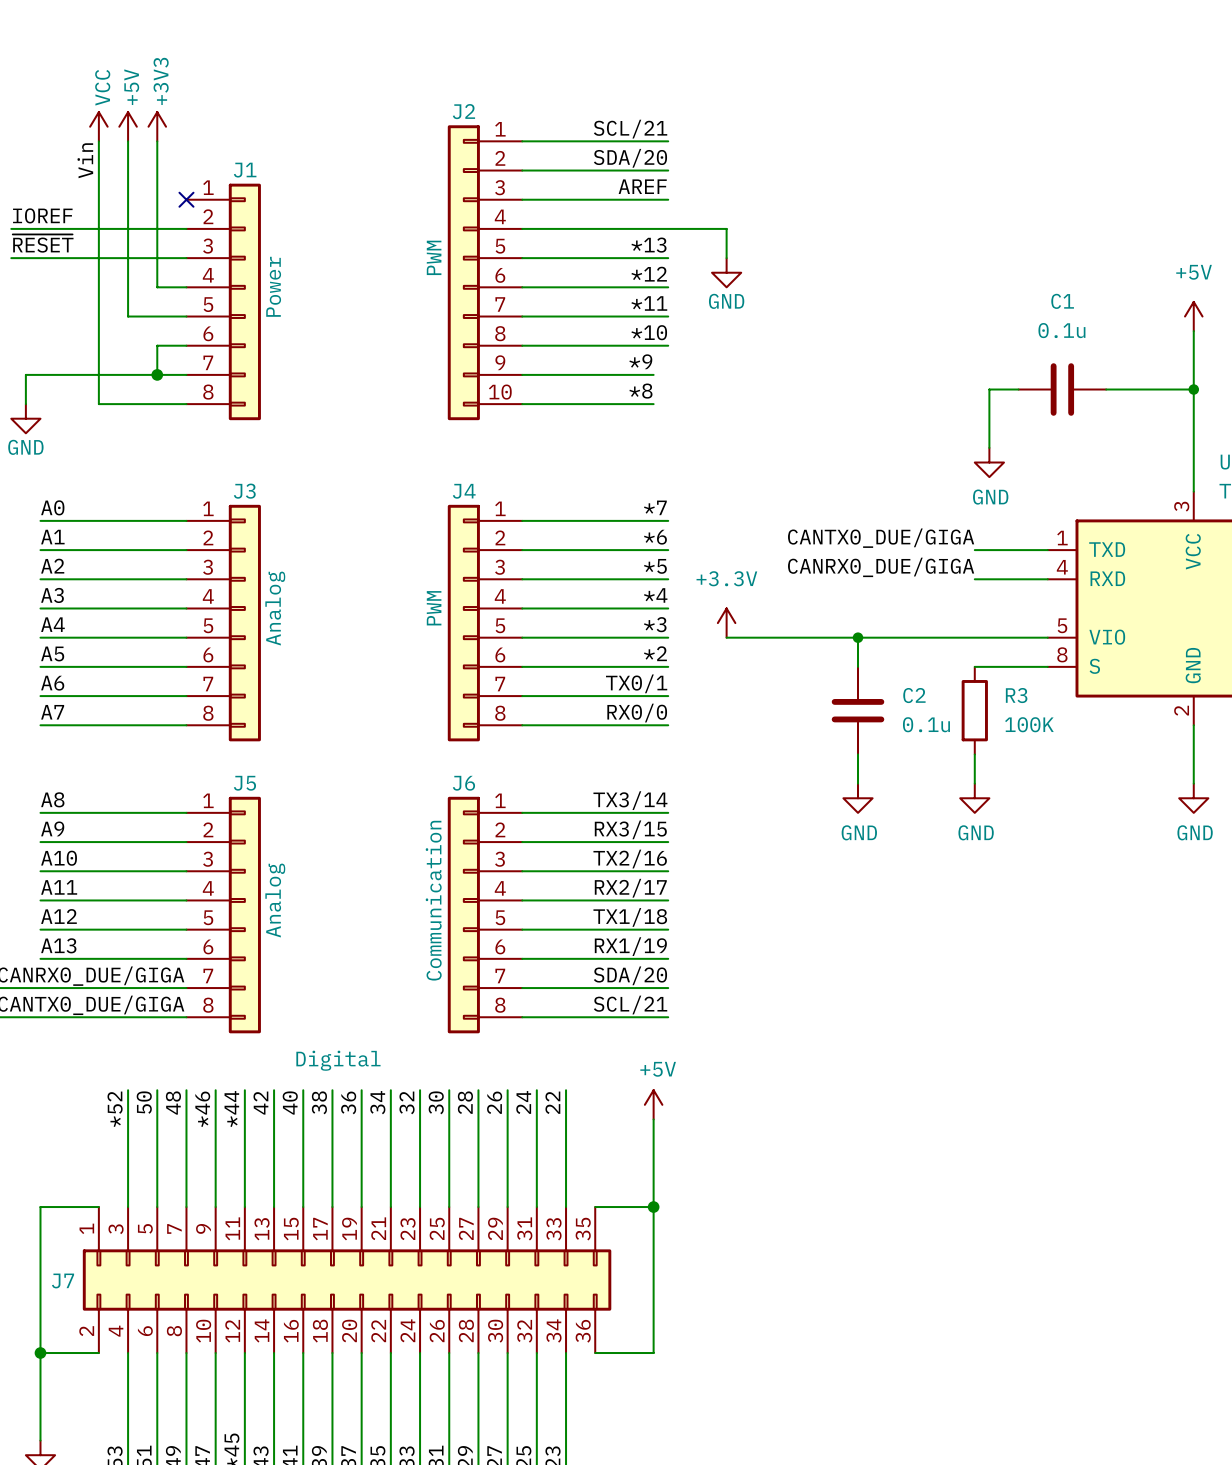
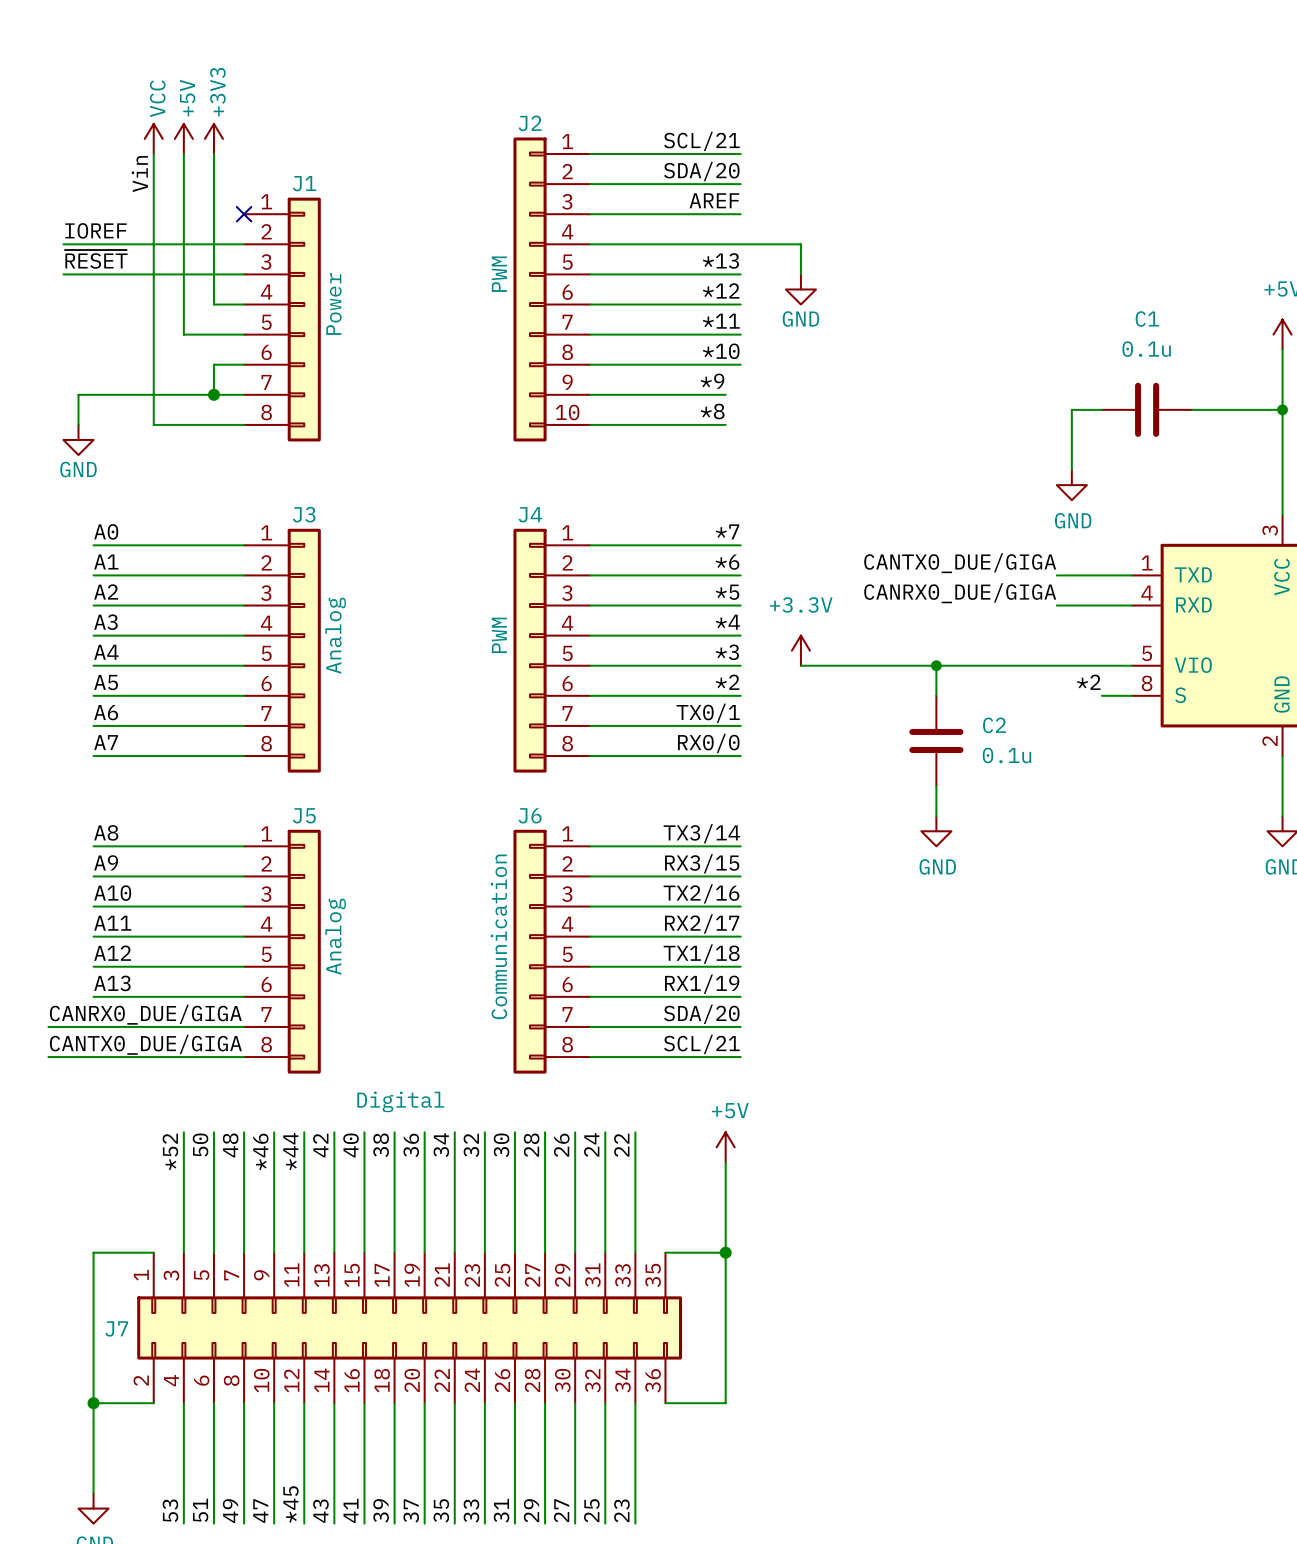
label: none -> *2 (1088, 682)
wire: (974, 666) (1018, 666) -> none
R3: 100K (974, 710) -> none
wire: (974, 754) (974, 783) -> none
power symbol: GND (974, 798) -> none

